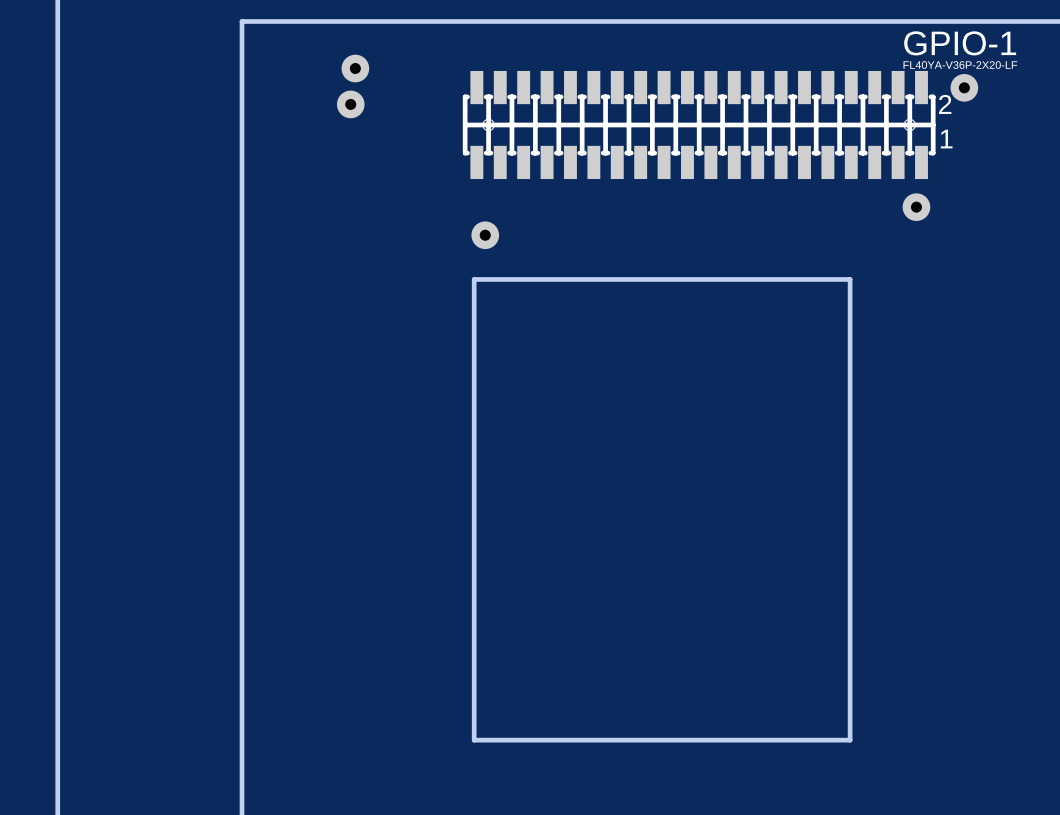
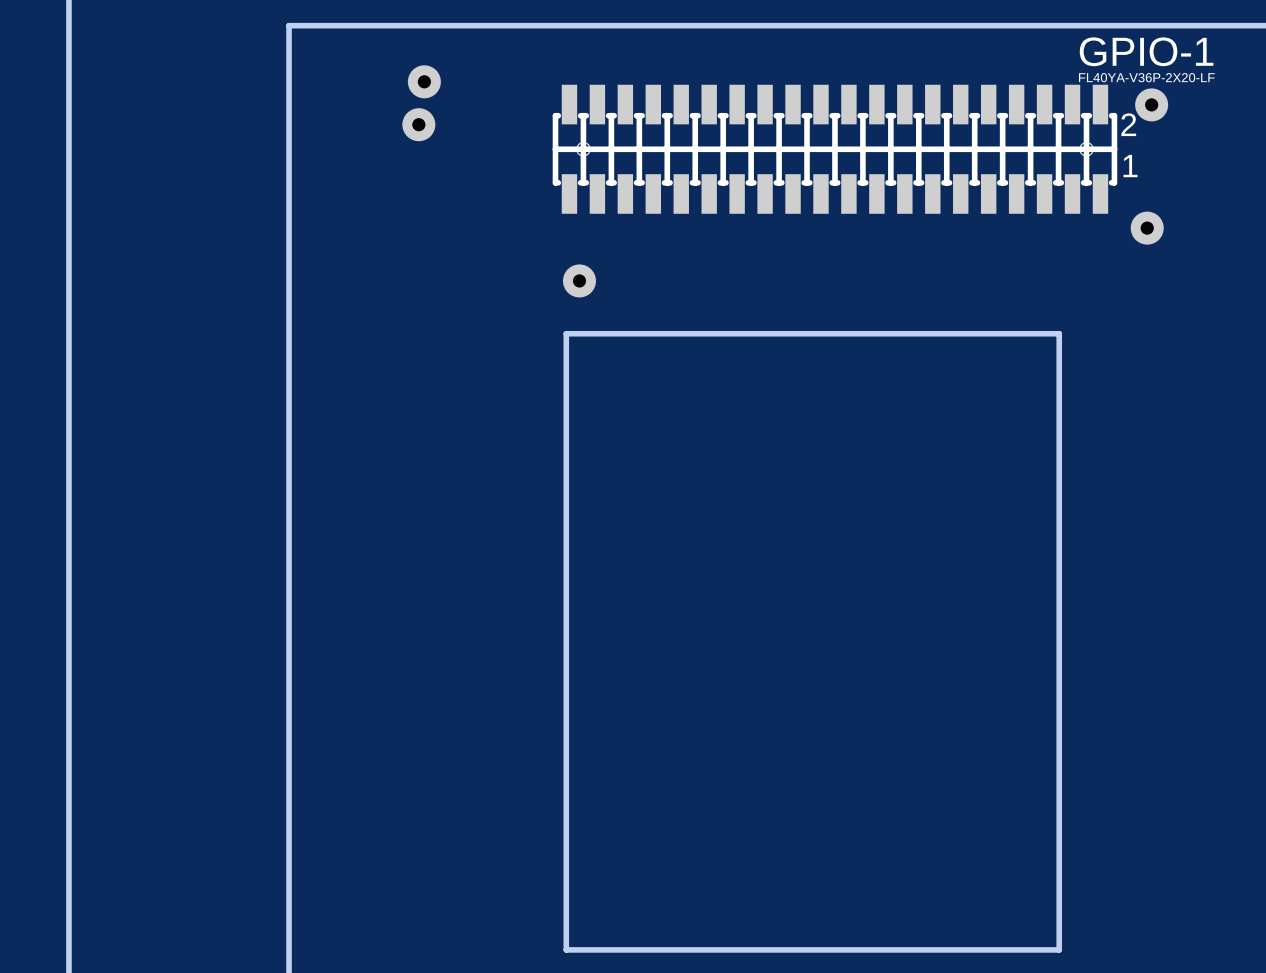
part position: (916, 207) -> (1147, 228)
board edge: (850, 279) (850, 740) (474, 740) -> (1015, 333) (1059, 333) (1059, 949) (566, 949) (566, 883)

